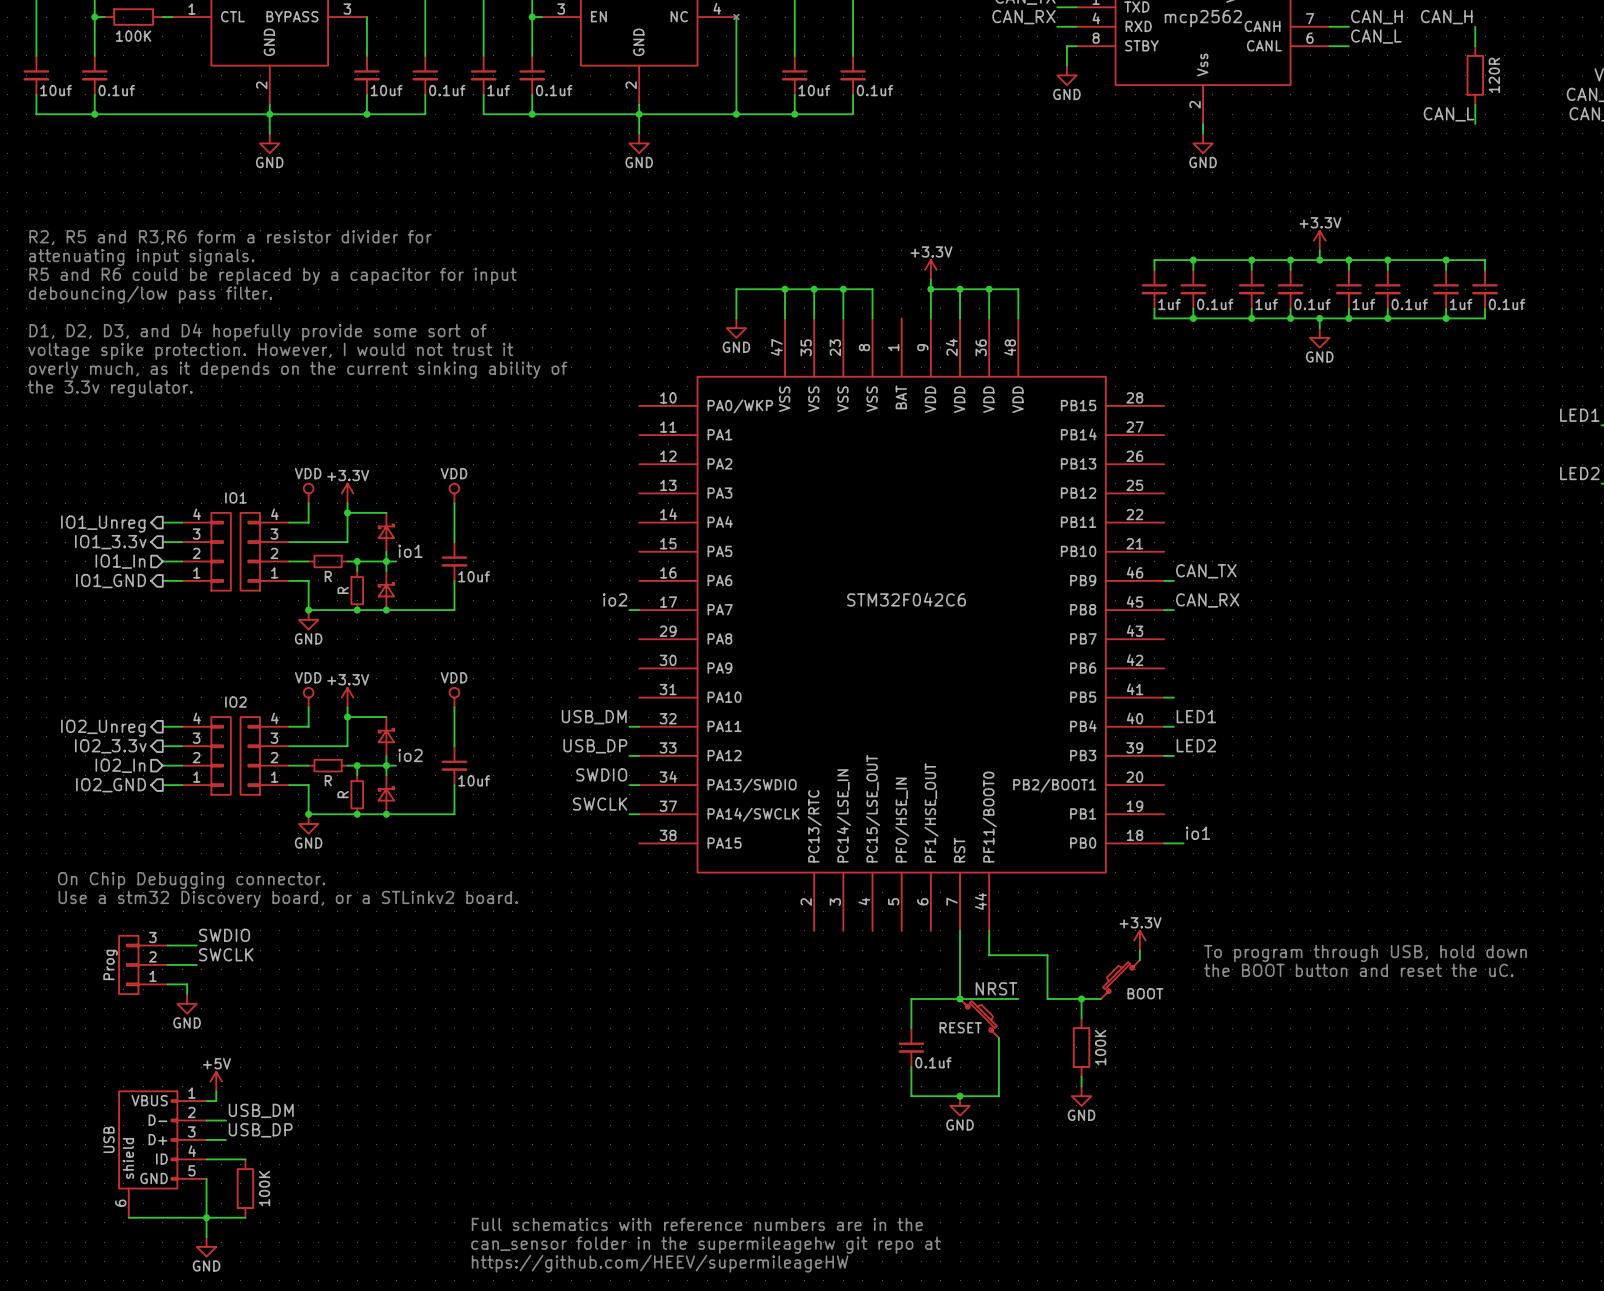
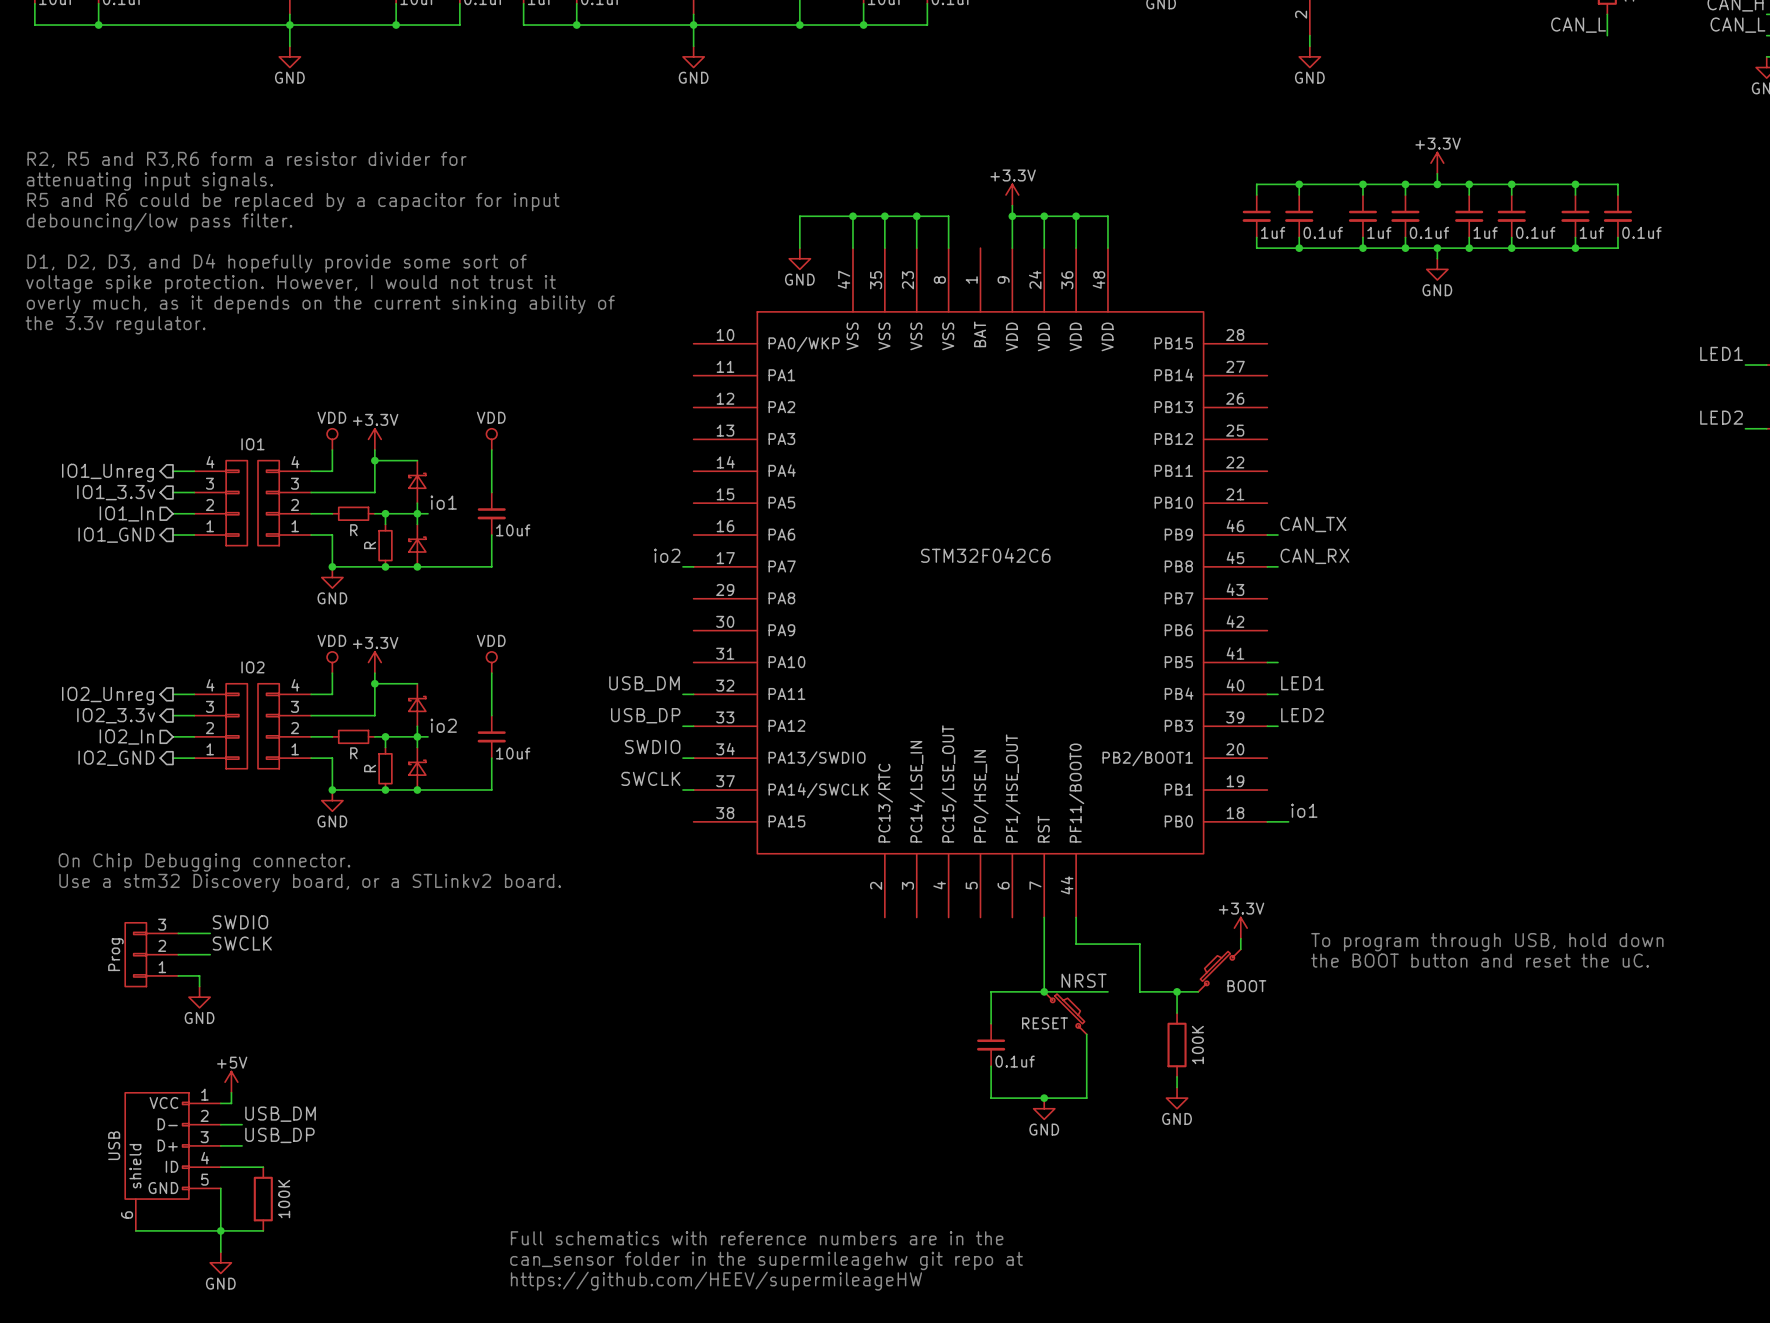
part pin name: VBUS (149, 1100) -> VCC (163, 1103)

